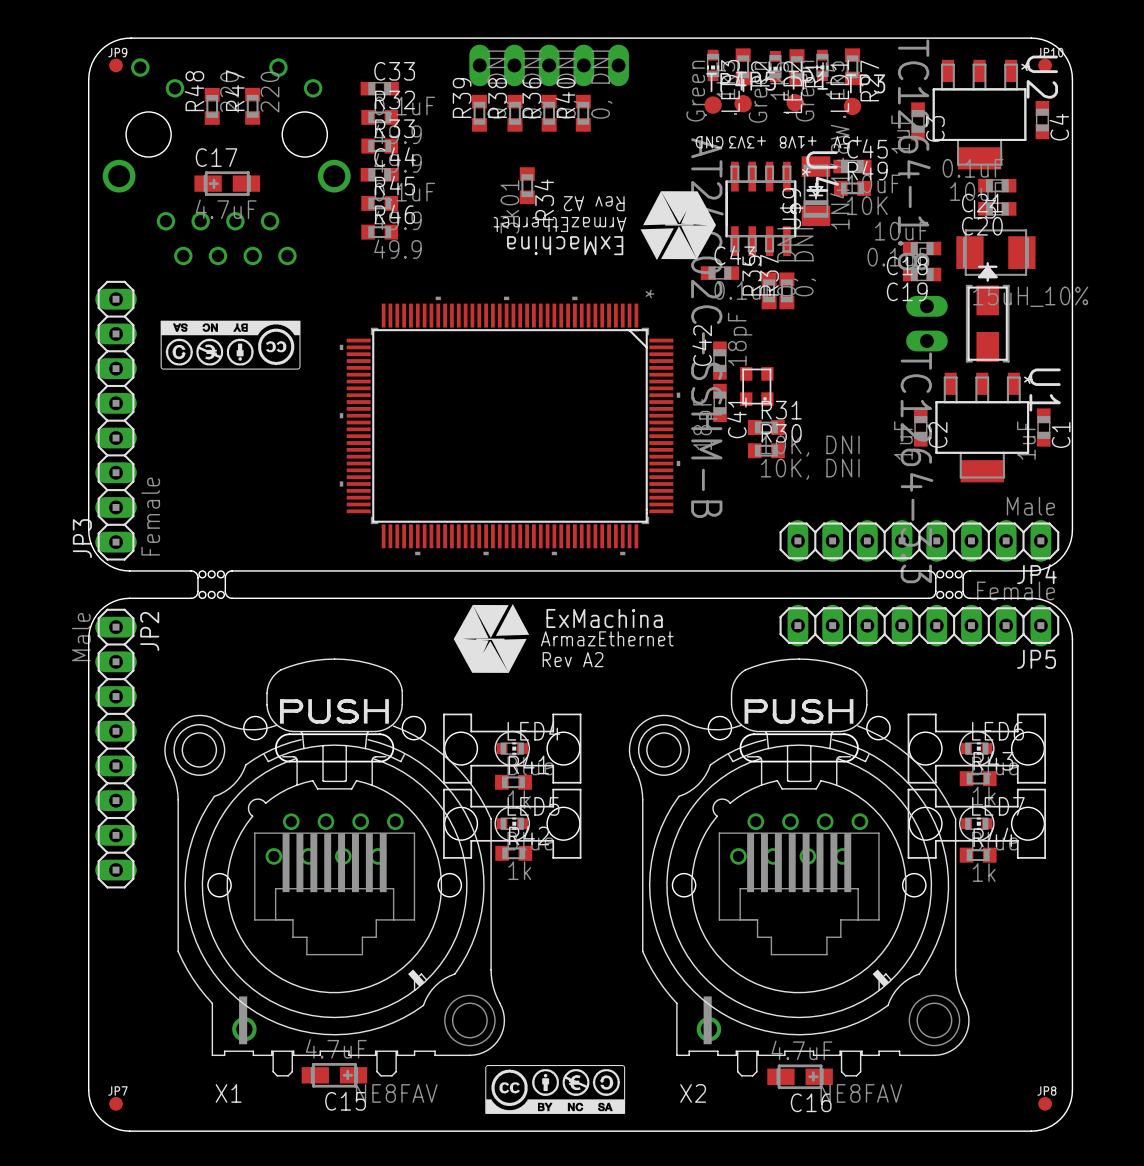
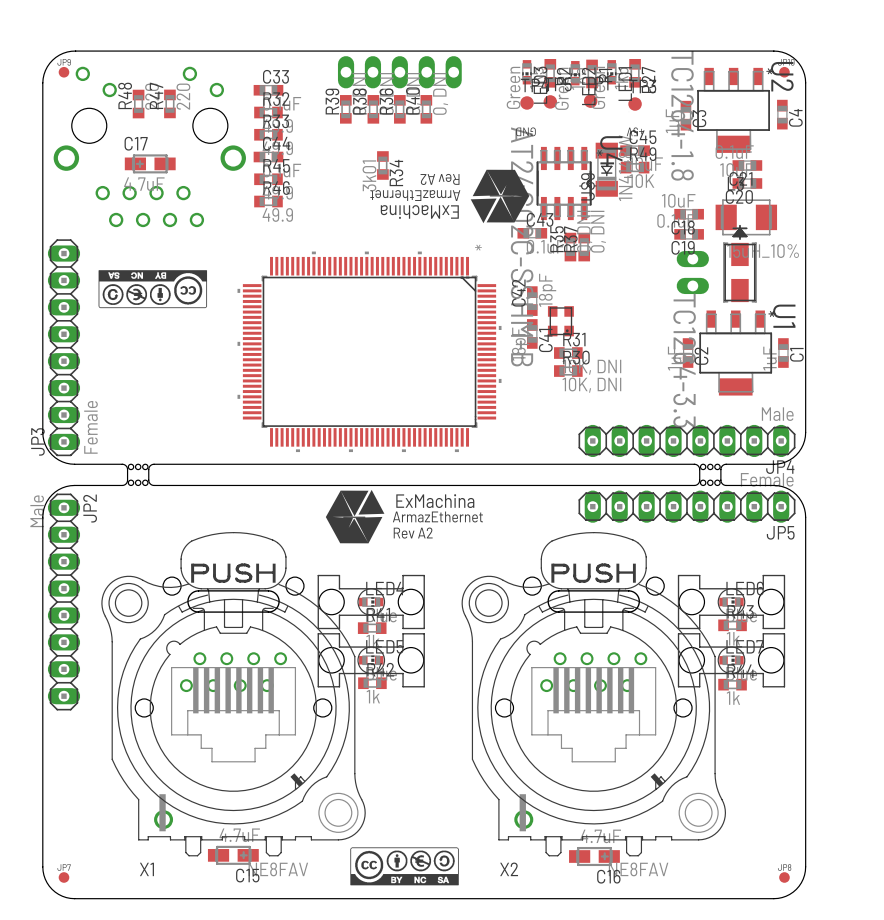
text: +3V3 (747, 142) -> none
text: +1V8 (798, 142) -> none

